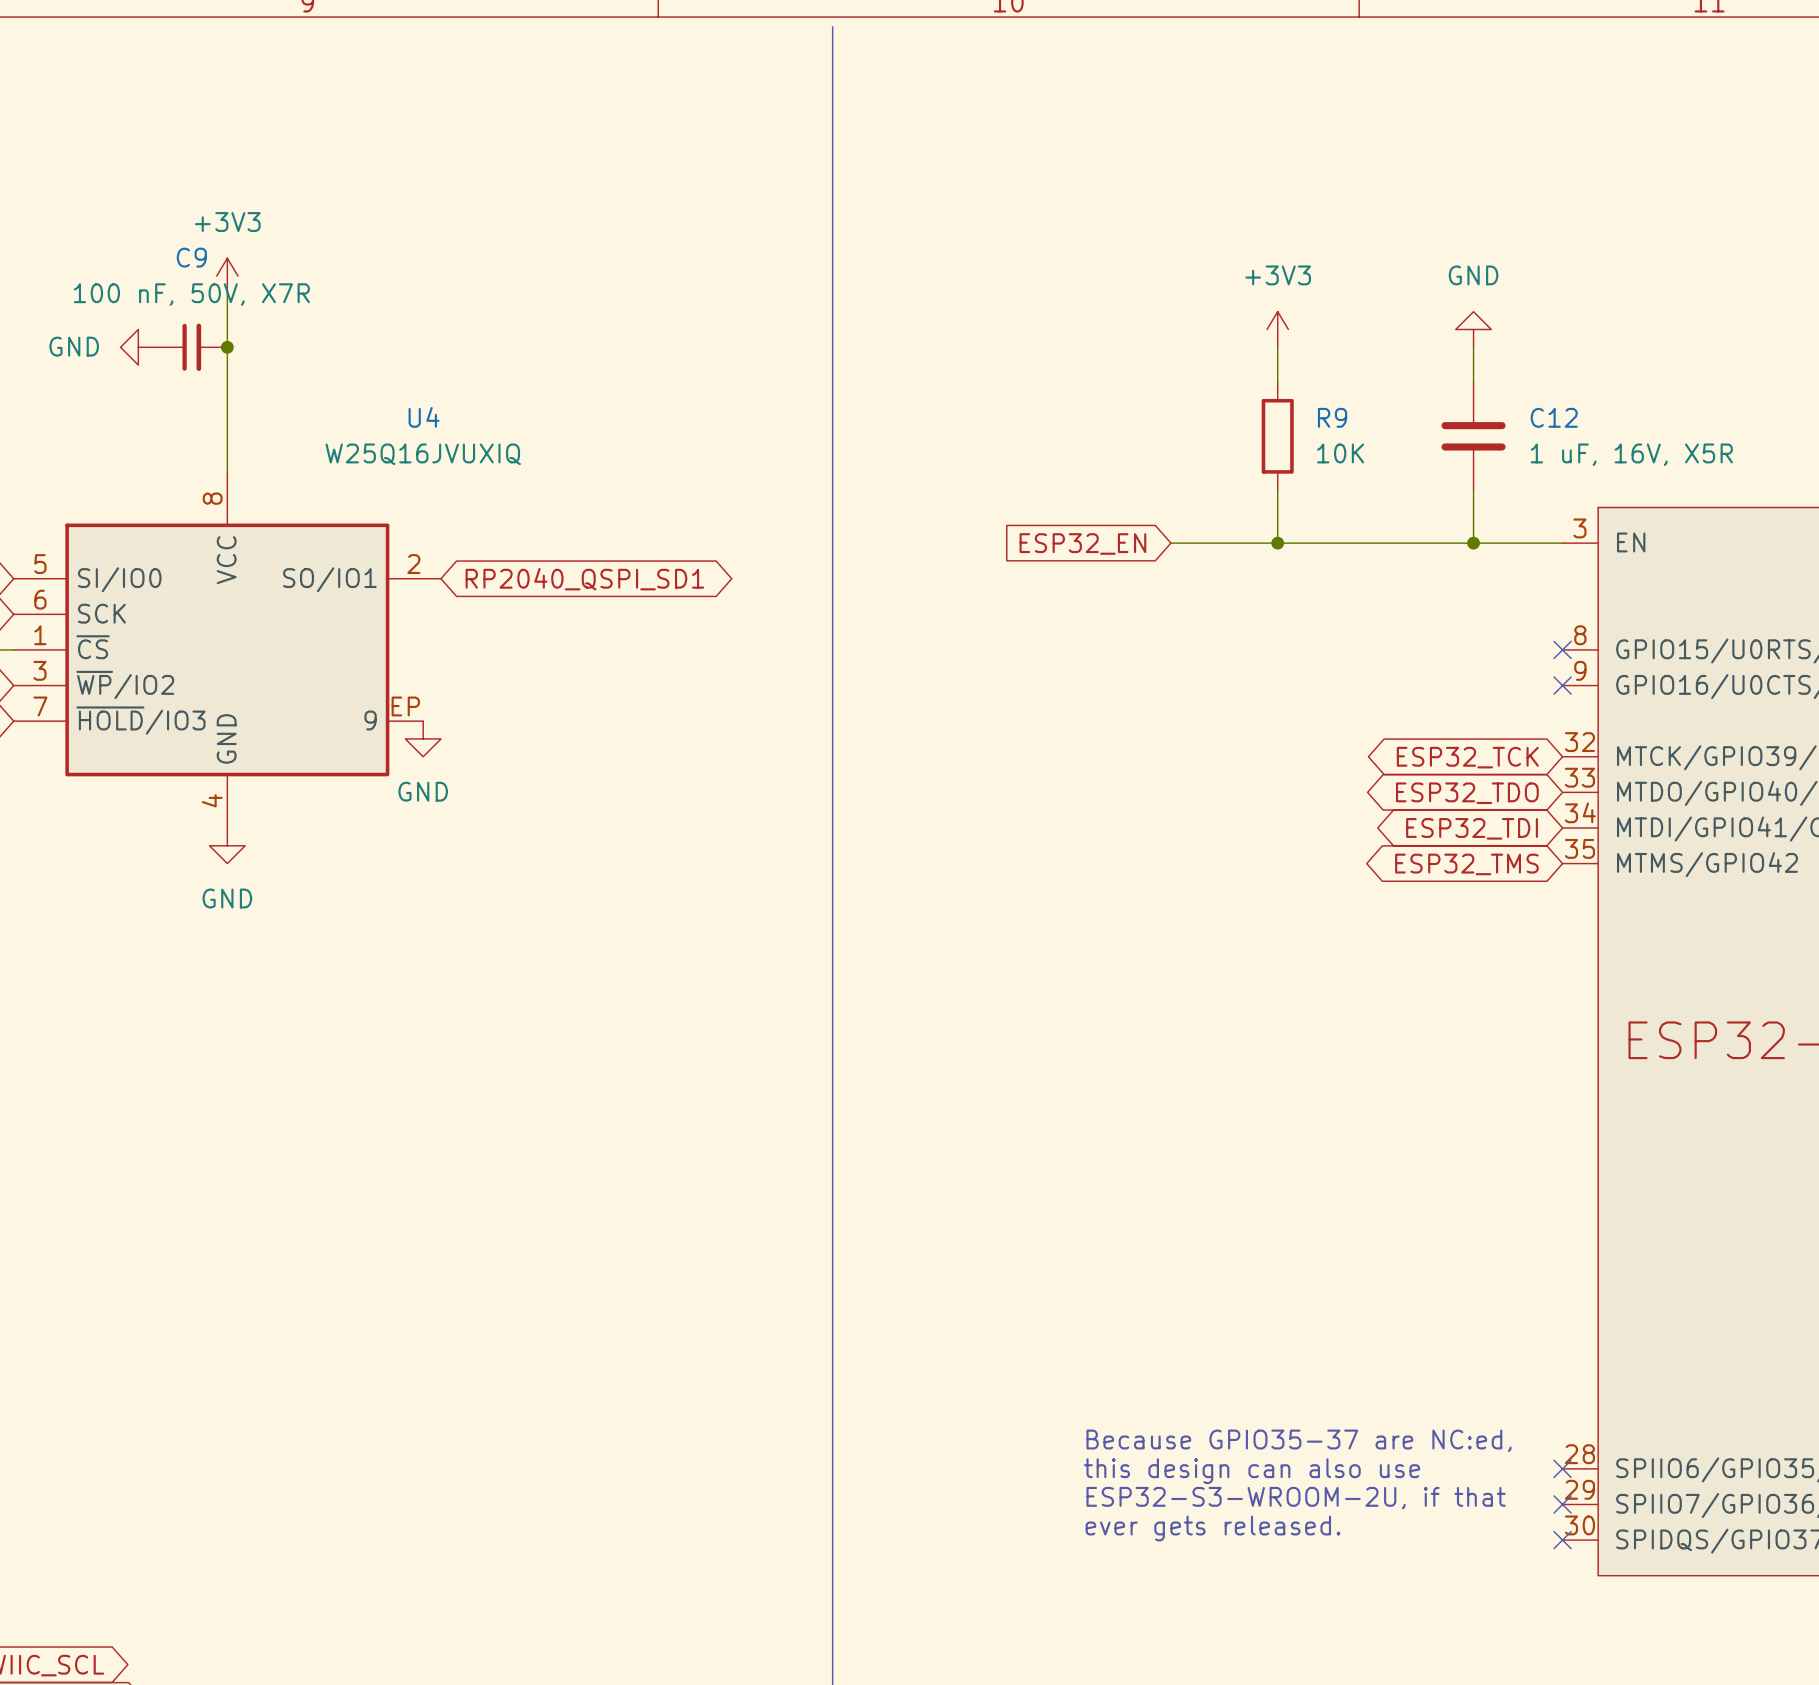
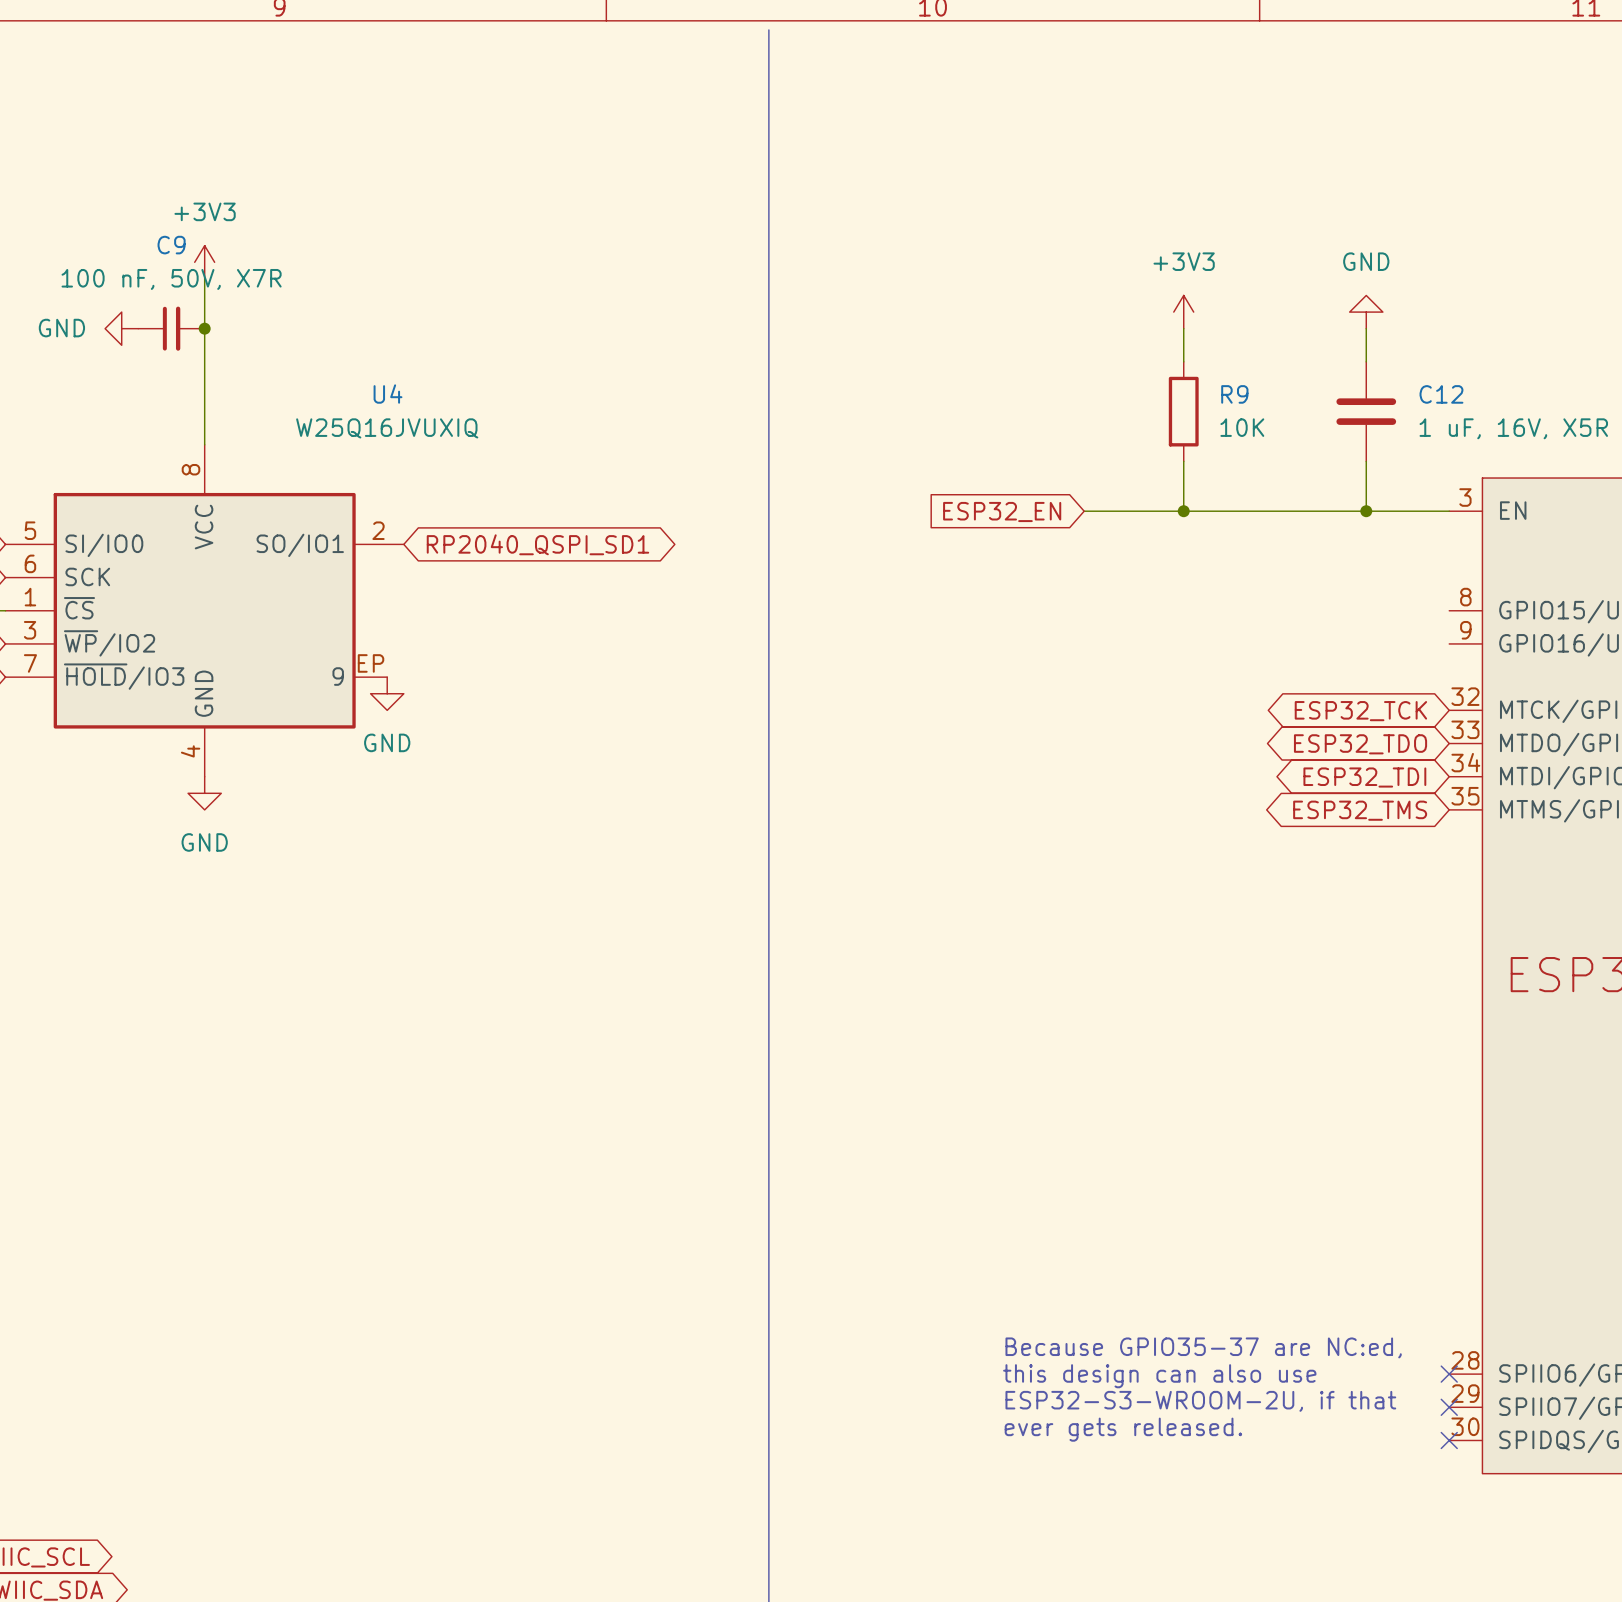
no-connect mark: (1562, 649) -> none
no-connect mark: (1562, 685) -> none

